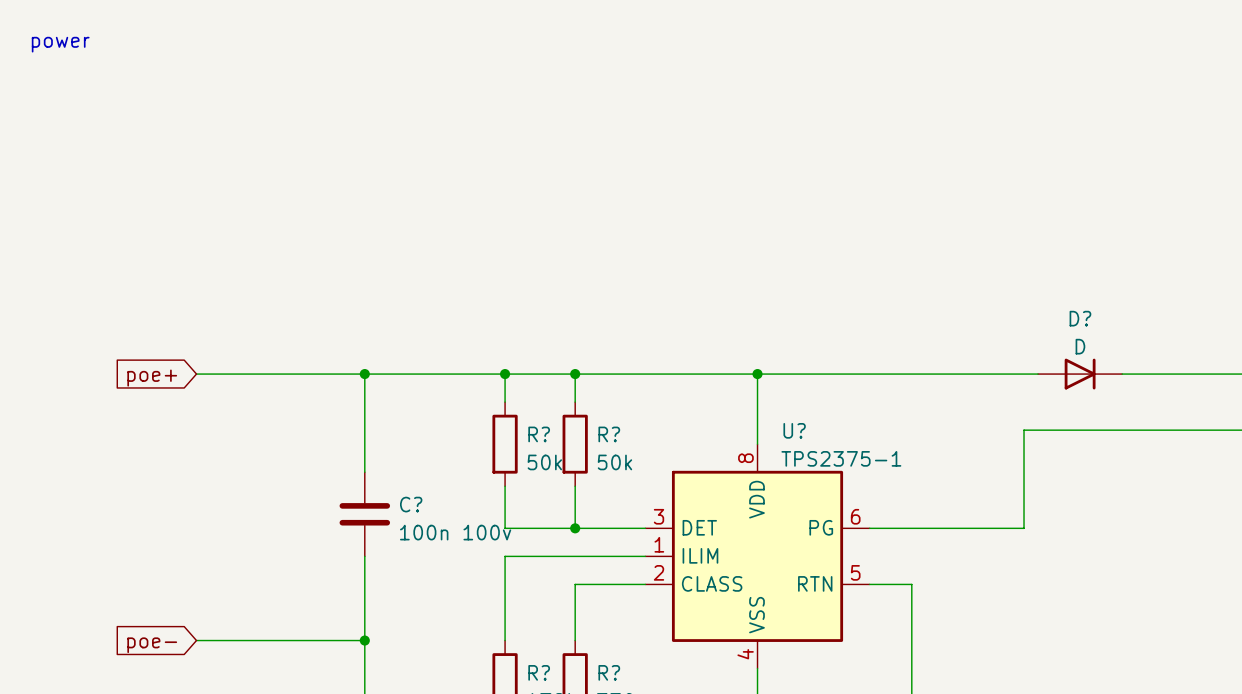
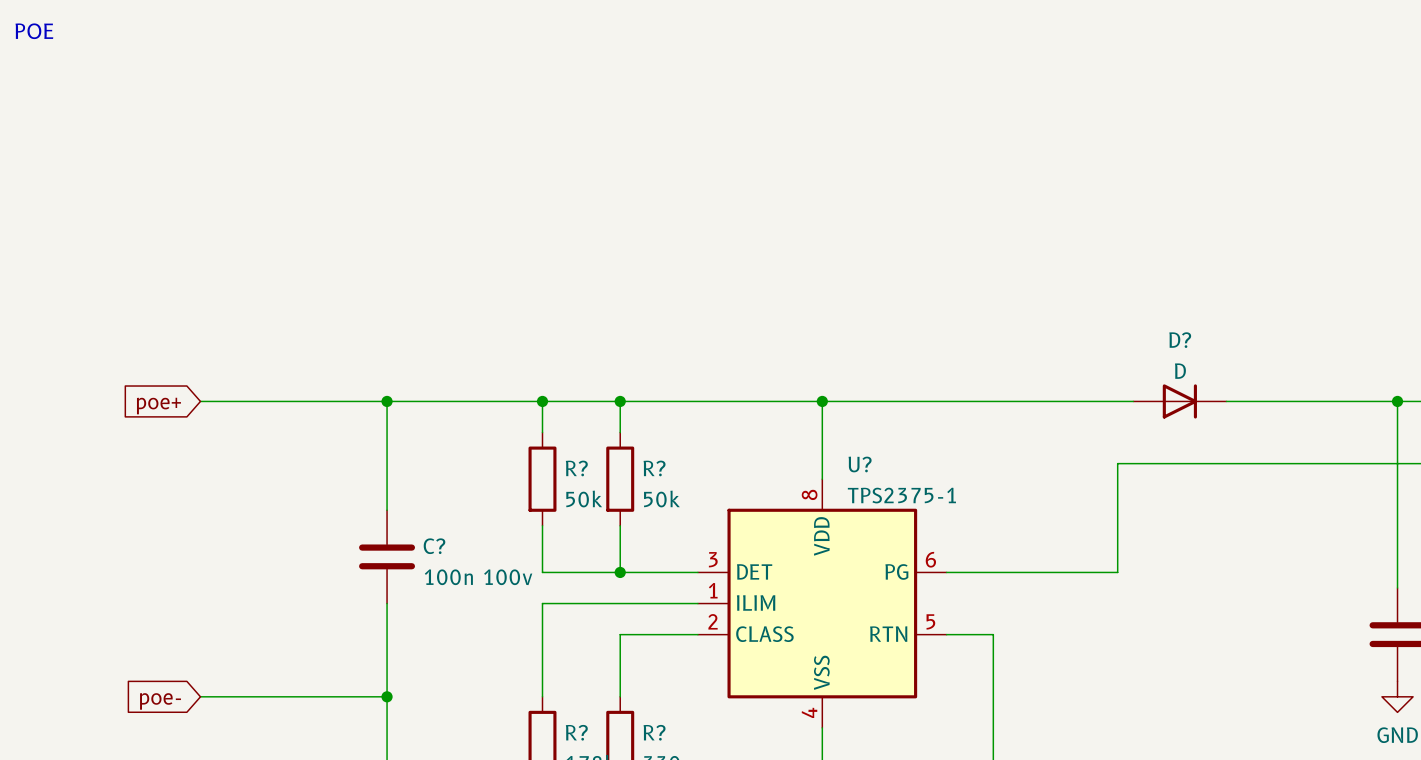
text: power (60, 44) -> POE (34, 31)

